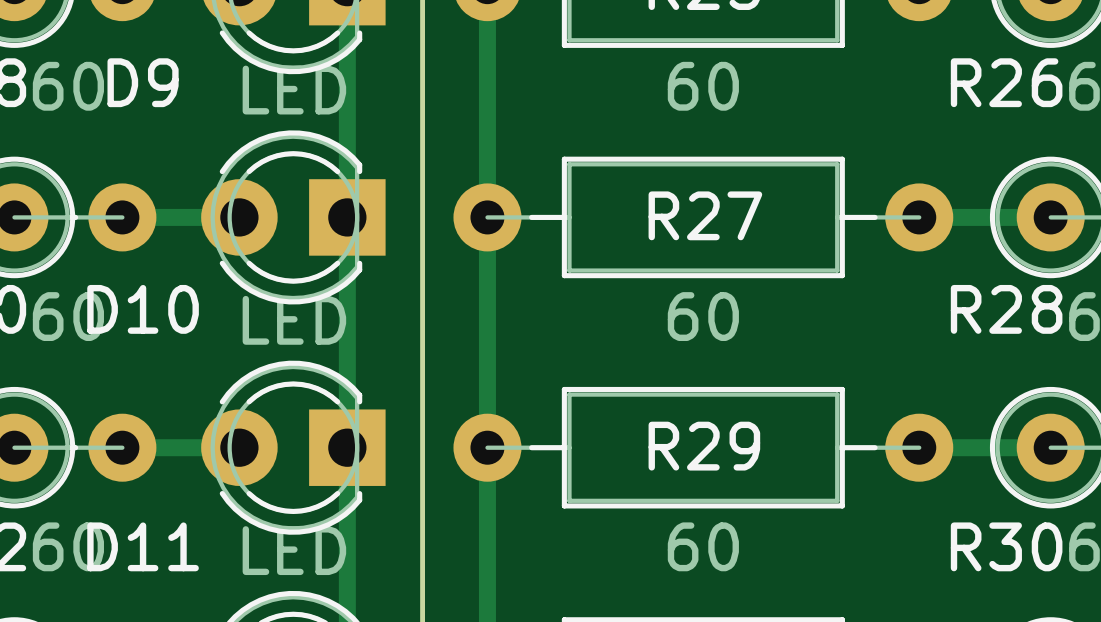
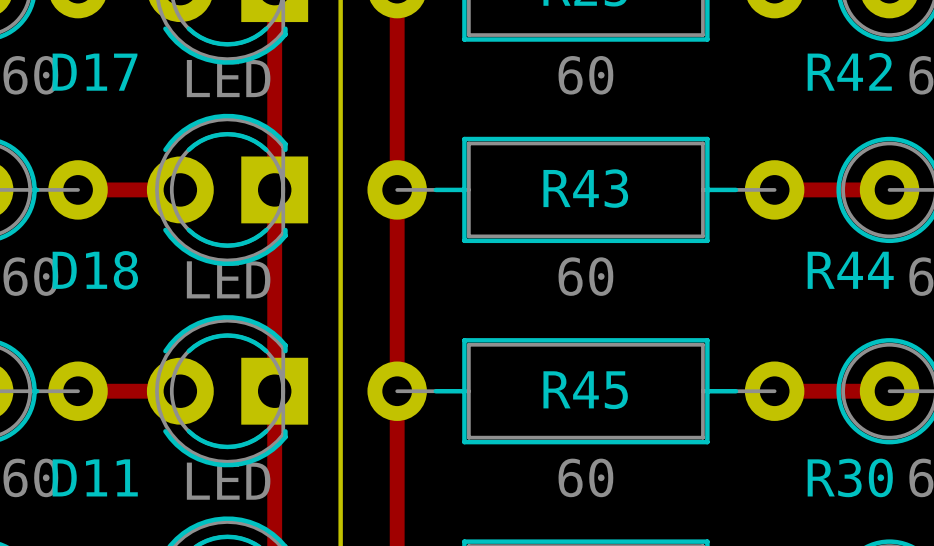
D9 name: D9 (143, 82) -> D17 (95, 72)
R26 name: R26 (1006, 82) -> R42 (849, 71)
R27 name: R27 (705, 215) -> R43 (585, 188)
D10 name: D10 (143, 309) -> D18 (95, 270)
R28 name: R28 (1006, 309) -> R44 (850, 270)
R29 name: R29 (704, 446) -> R45 (585, 390)

